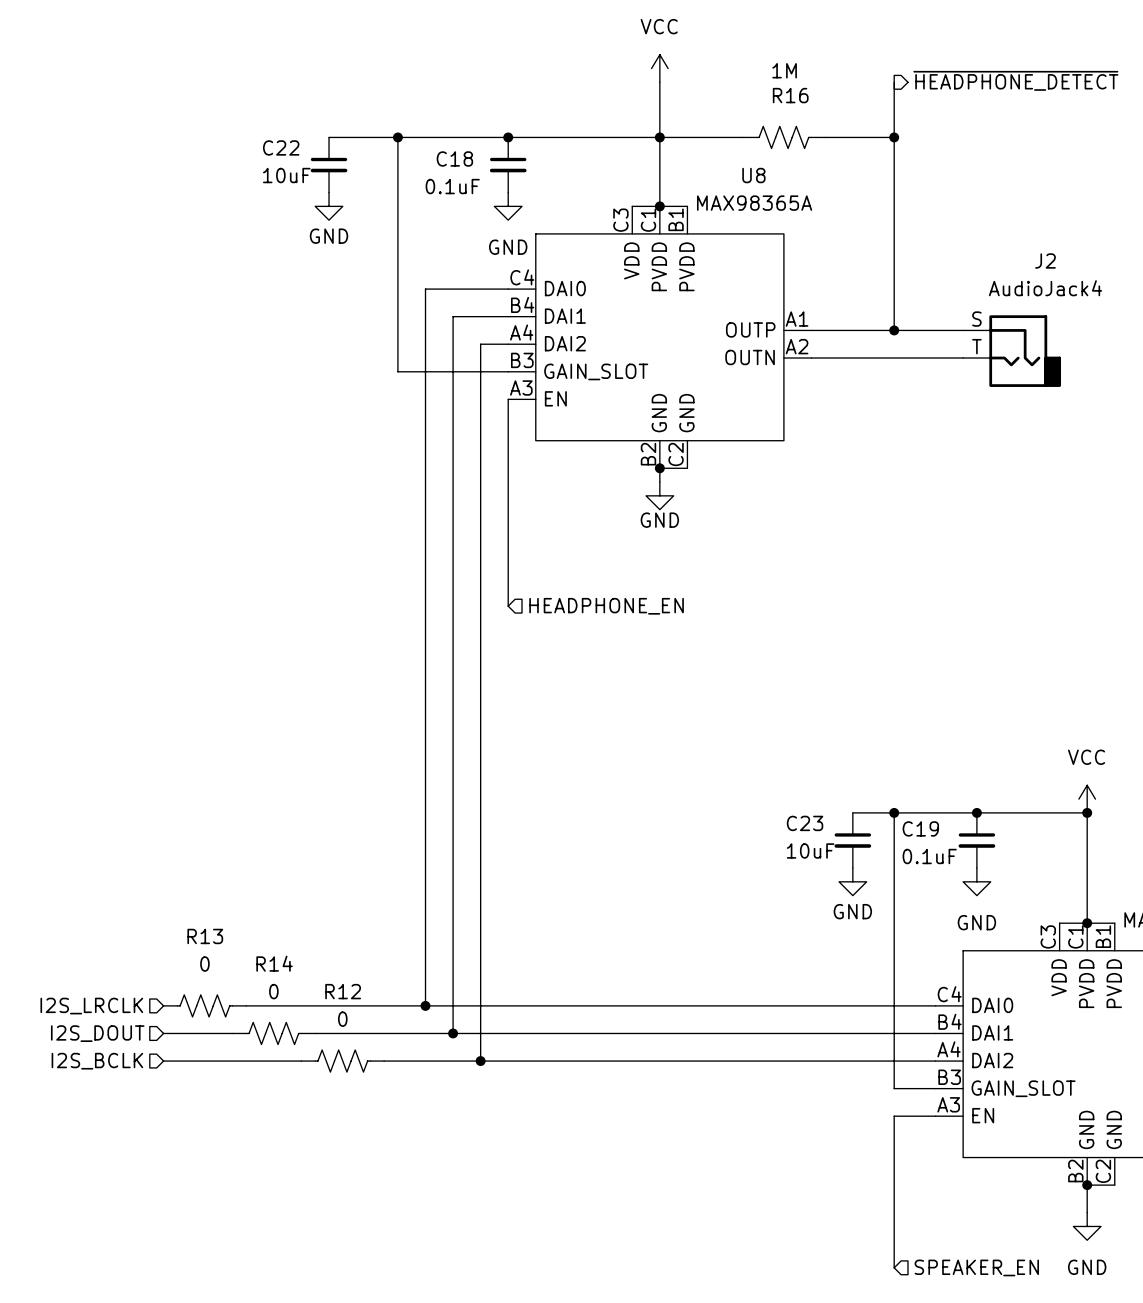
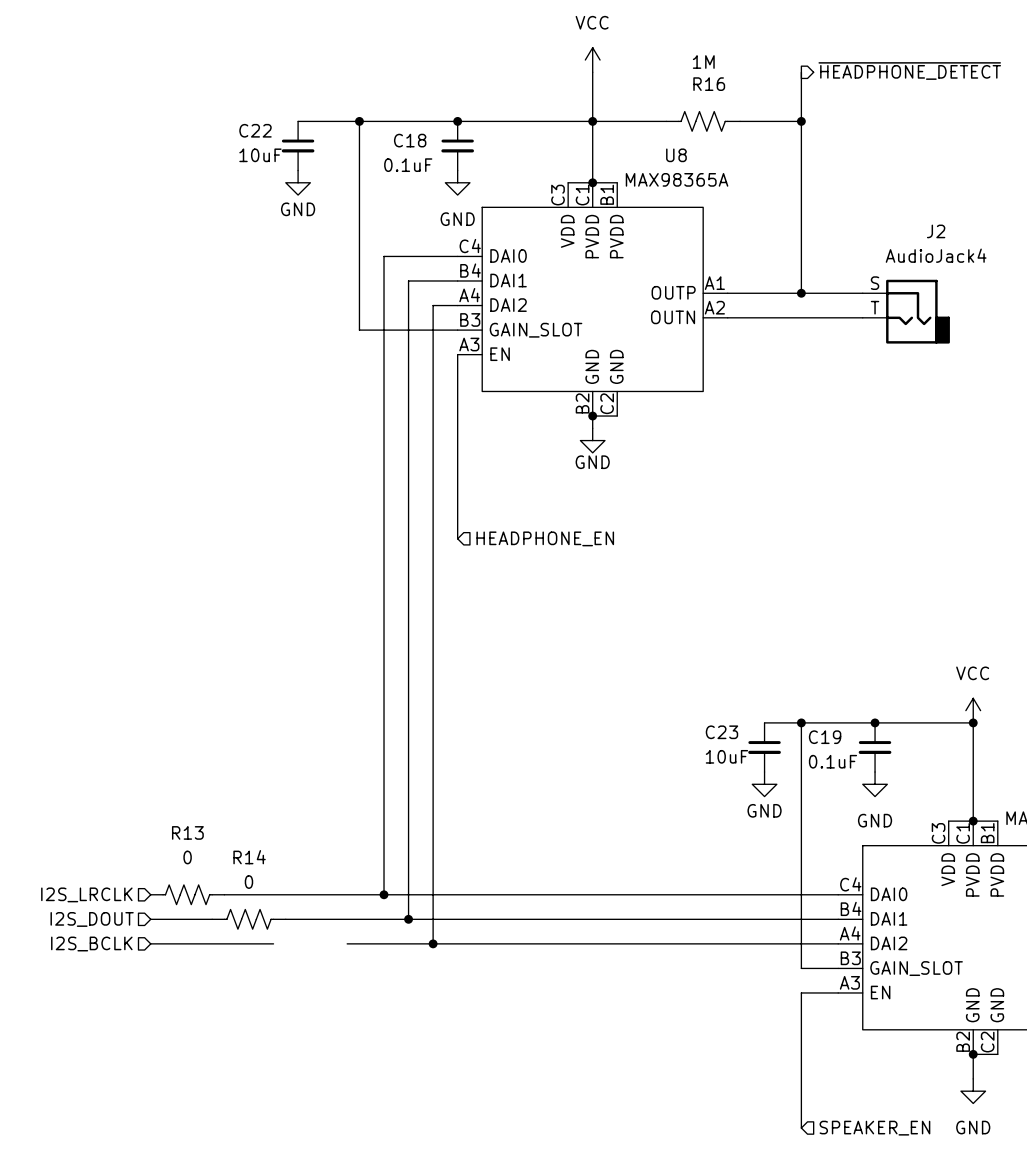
R12: 0 (342, 1061) -> none

